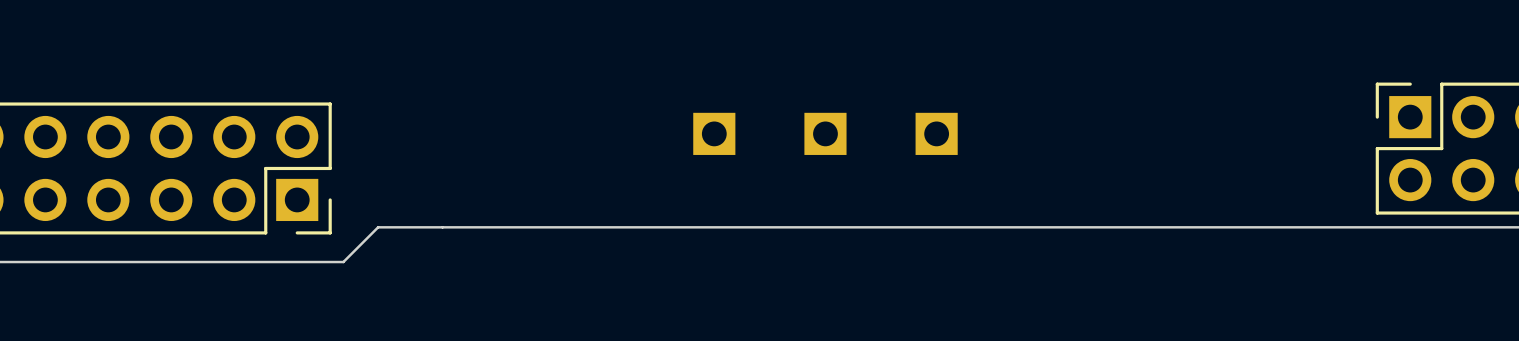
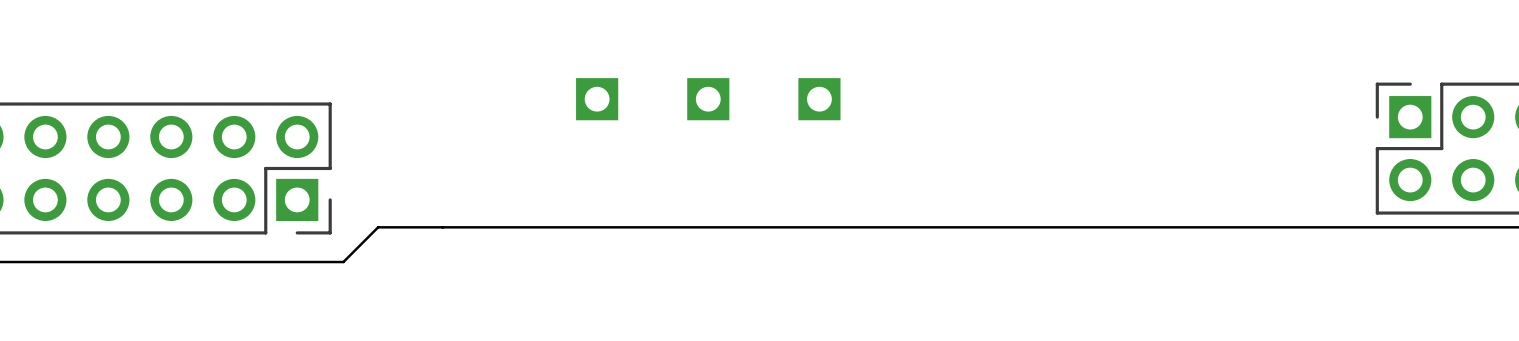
part: none -> (597, 99)
part position: (714, 133) -> (708, 99)
part position: (825, 133) -> (819, 99)
part: (936, 133) -> none

